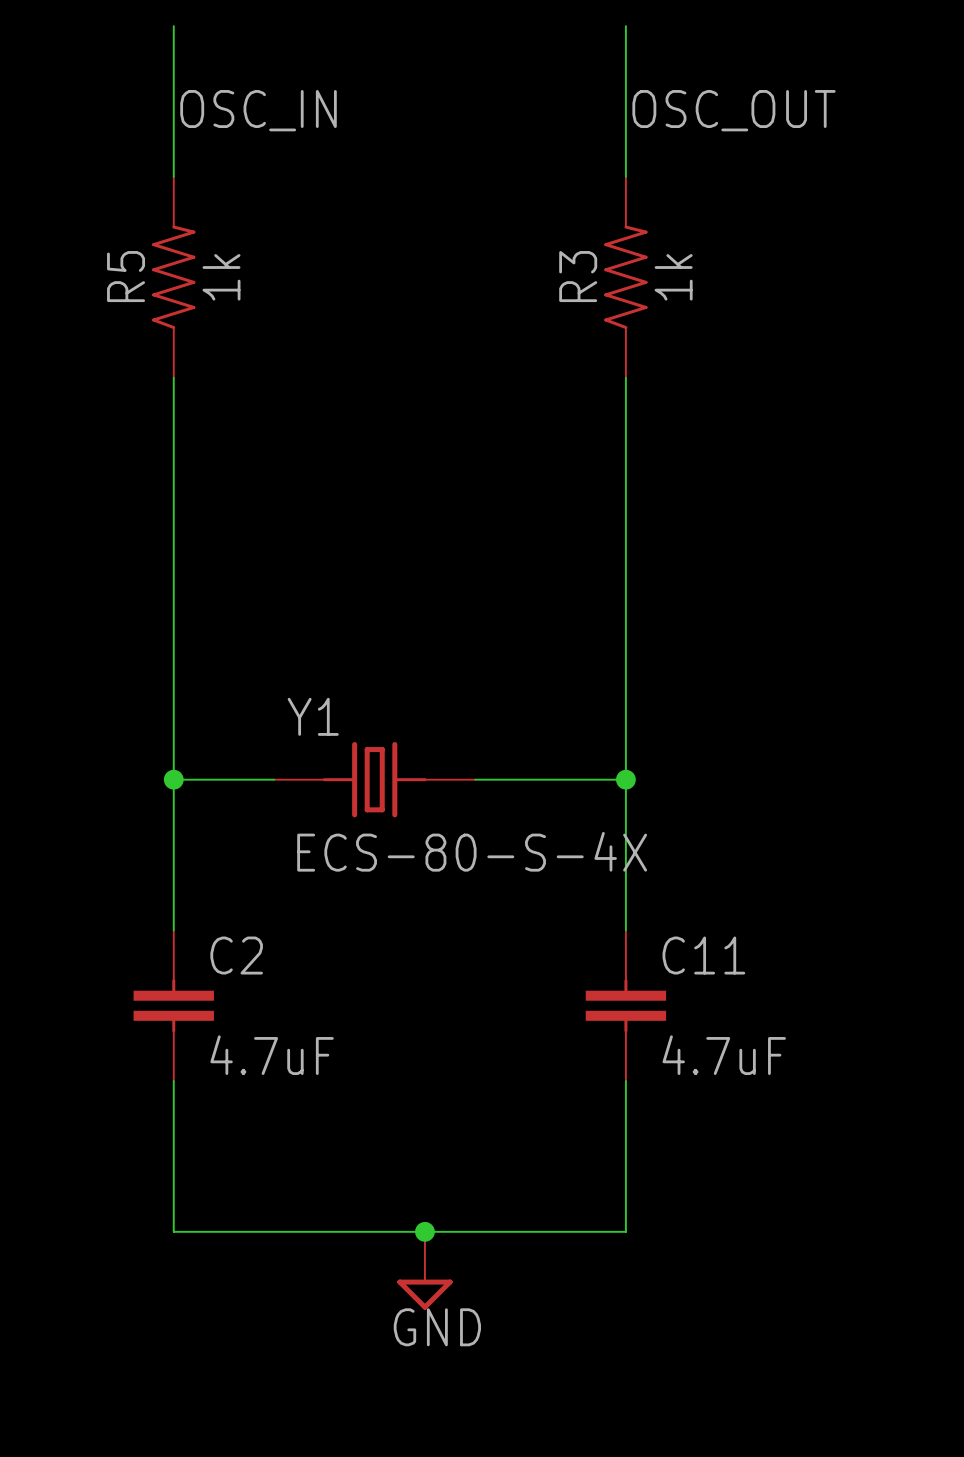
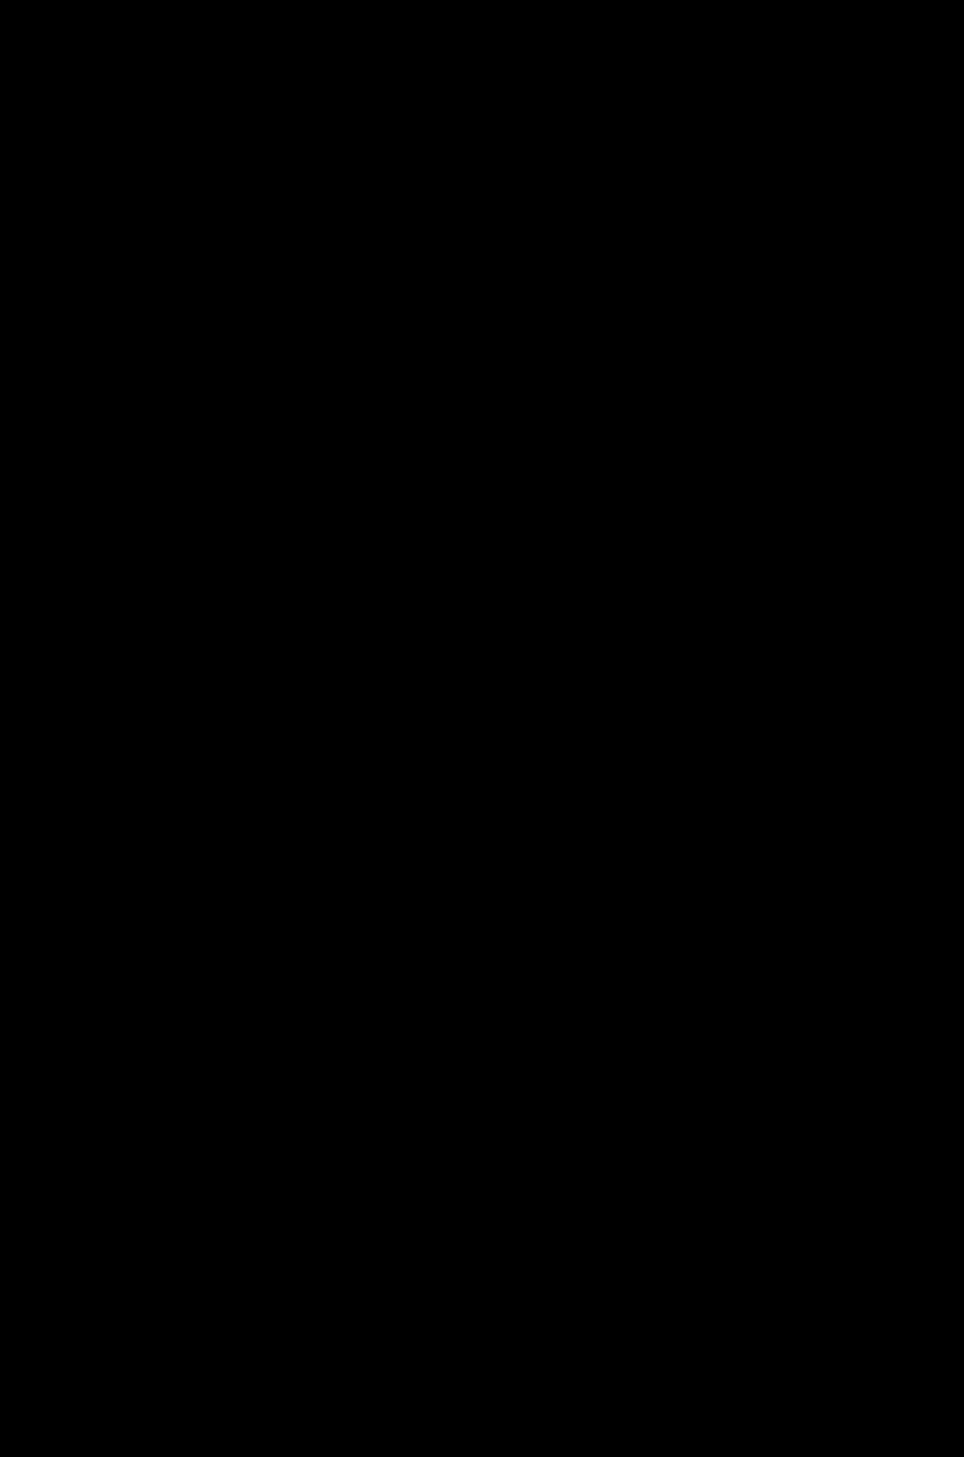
wire: (173, 26) (173, 176) -> none
wire: (625, 26) (625, 176) -> none
label: OSC_IN (258, 110) -> none
label: OSC_OUT (734, 110) -> none
R5: 1k (173, 277) -> none
R3: 1k (625, 277) -> none
wire: (173, 377) (173, 930) -> none
wire: (625, 377) (625, 930) -> none
wire: (173, 779) (274, 779) -> none
junction: (173, 779) -> none
Y1: ECS-80-S-4X (374, 779) -> none
wire: (475, 779) (625, 779) -> none
junction: (625, 779) -> none
C2: 4.7uF (173, 1005) -> none
C11: 4.7uF (625, 1005) -> none
wire: (173, 1081) (173, 1231) (625, 1231) (625, 1081) -> none
junction: (424, 1231) -> none
power symbol: GND (424, 1270) -> none

